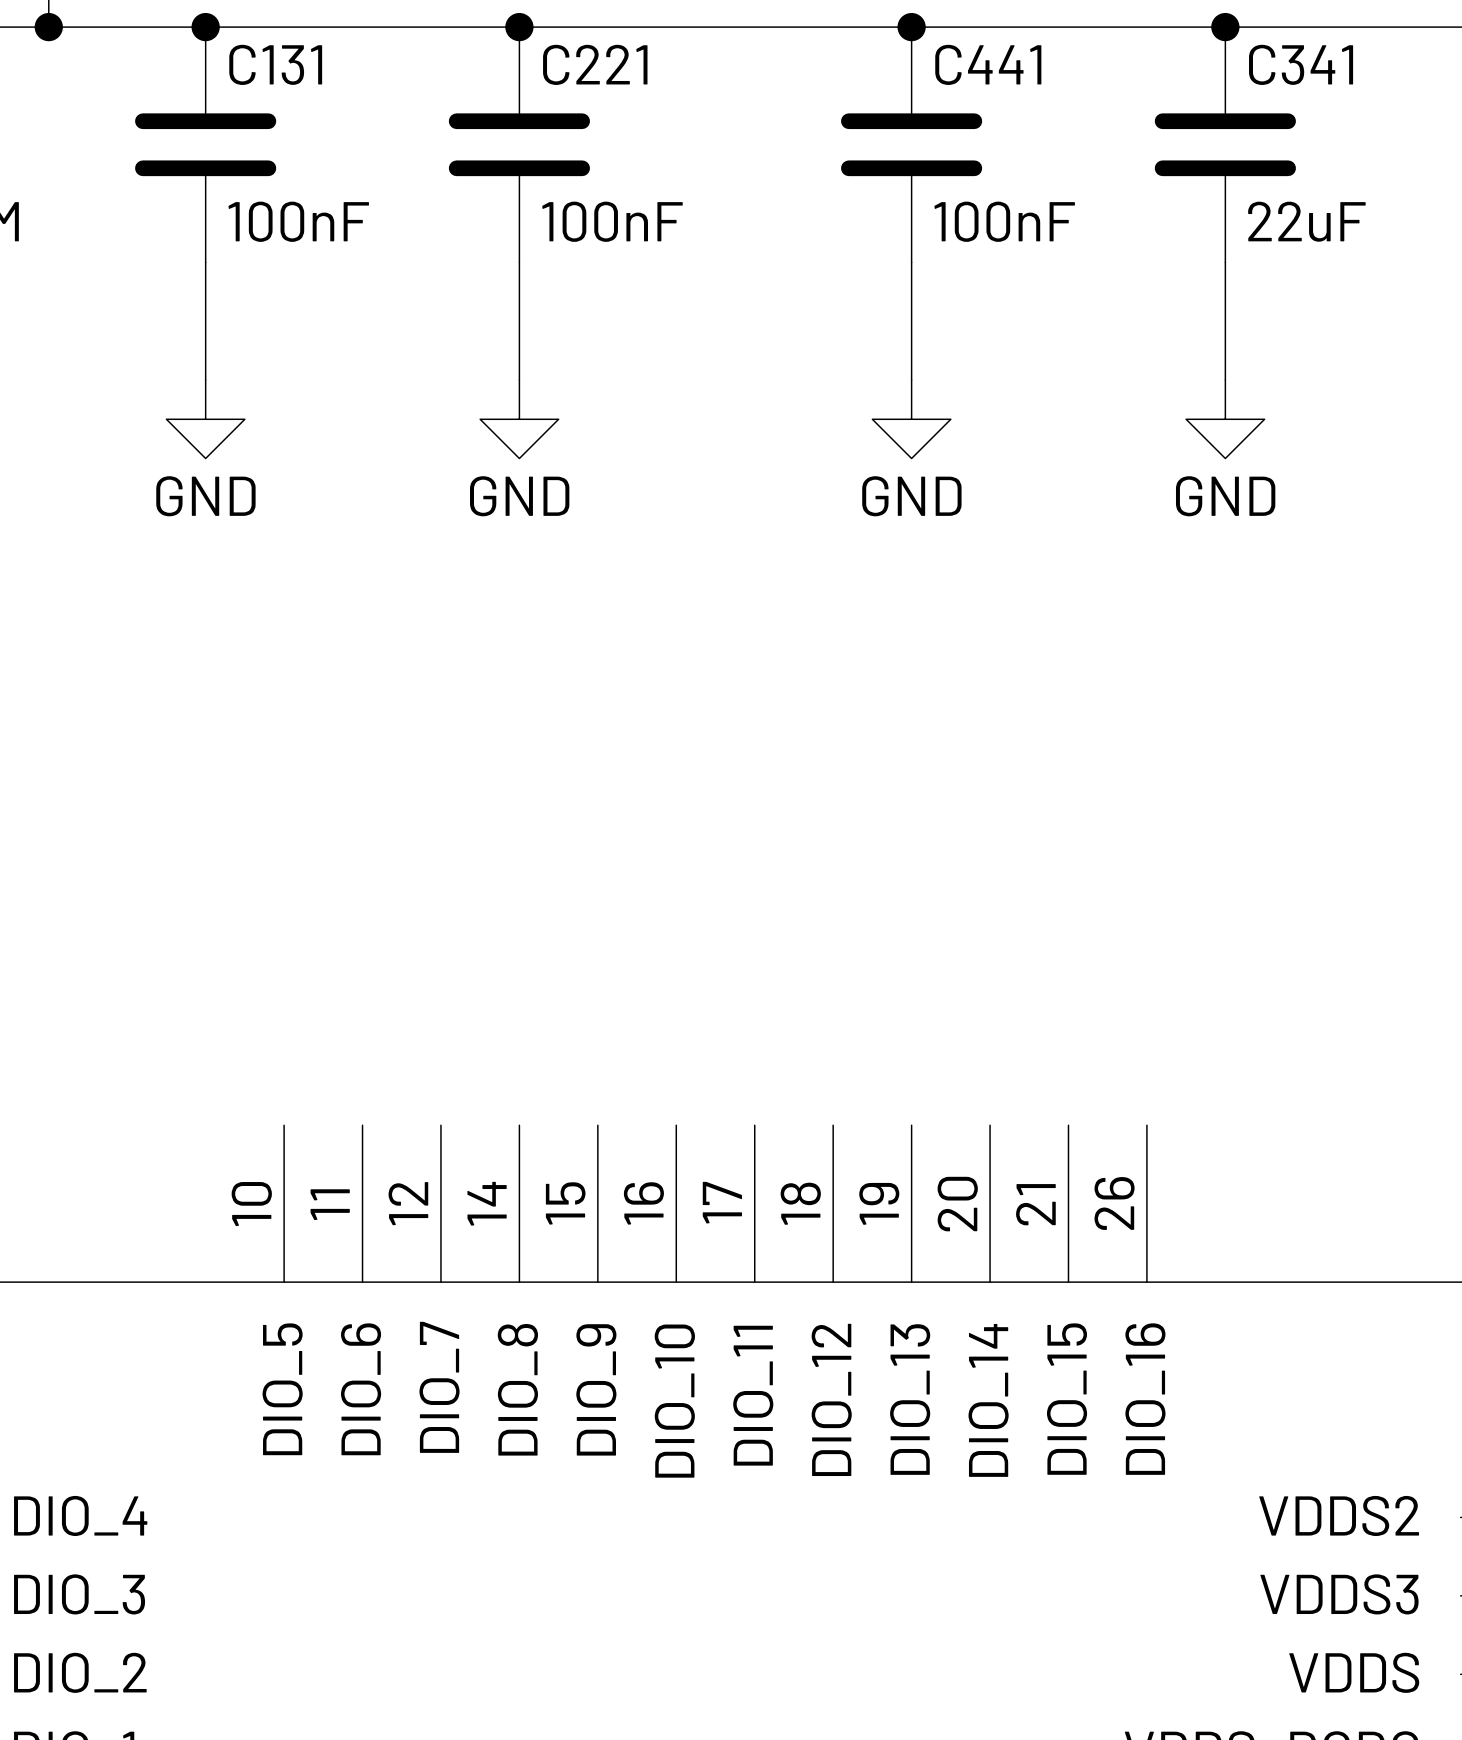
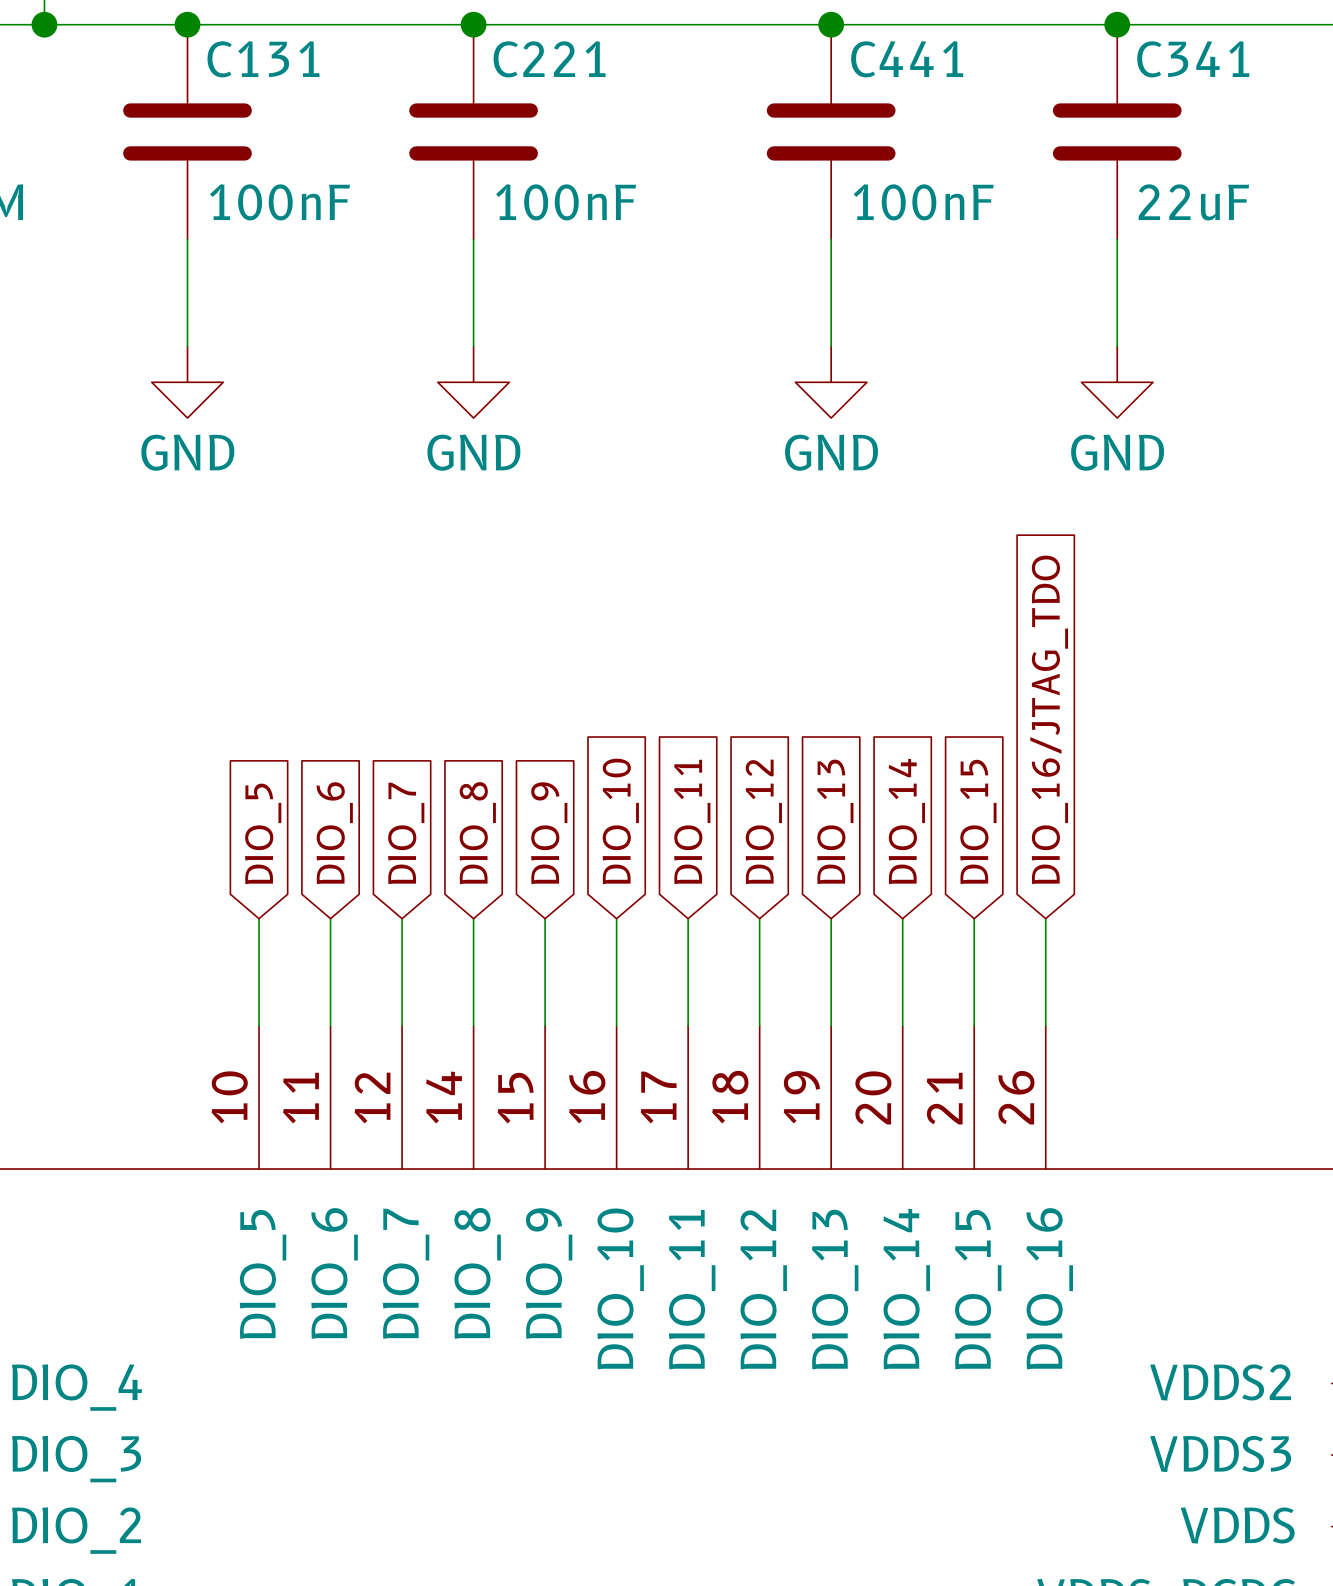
global label: none -> DIO_16/JTAG_TDO (1049, 719)
global label: none -> DIO_10 (620, 821)
global label: none -> DIO_12 (763, 821)
global label: none -> DIO_14 (906, 821)
global label: none -> DIO_15 (978, 821)
global label: none -> DIO_13 (835, 821)
global label: none -> DIO_11 (692, 821)
global label: none -> DIO_5 (263, 833)
global label: none -> DIO_6 (334, 833)
global label: none -> DIO_7 (406, 833)
global label: none -> DIO_8 (477, 833)
global label: none -> DIO_9 (549, 833)
wire: none -> (259, 918) (259, 1025)
wire: none -> (330, 918) (330, 1025)
wire: none -> (402, 918) (402, 1025)
wire: none -> (473, 918) (473, 1025)
wire: none -> (545, 918) (545, 1025)
wire: none -> (616, 918) (616, 1025)
wire: none -> (688, 918) (688, 1025)
wire: none -> (759, 918) (759, 1025)
wire: none -> (831, 918) (831, 1025)
wire: none -> (902, 918) (902, 1025)
wire: none -> (974, 918) (974, 1025)
wire: none -> (1045, 918) (1045, 1025)

